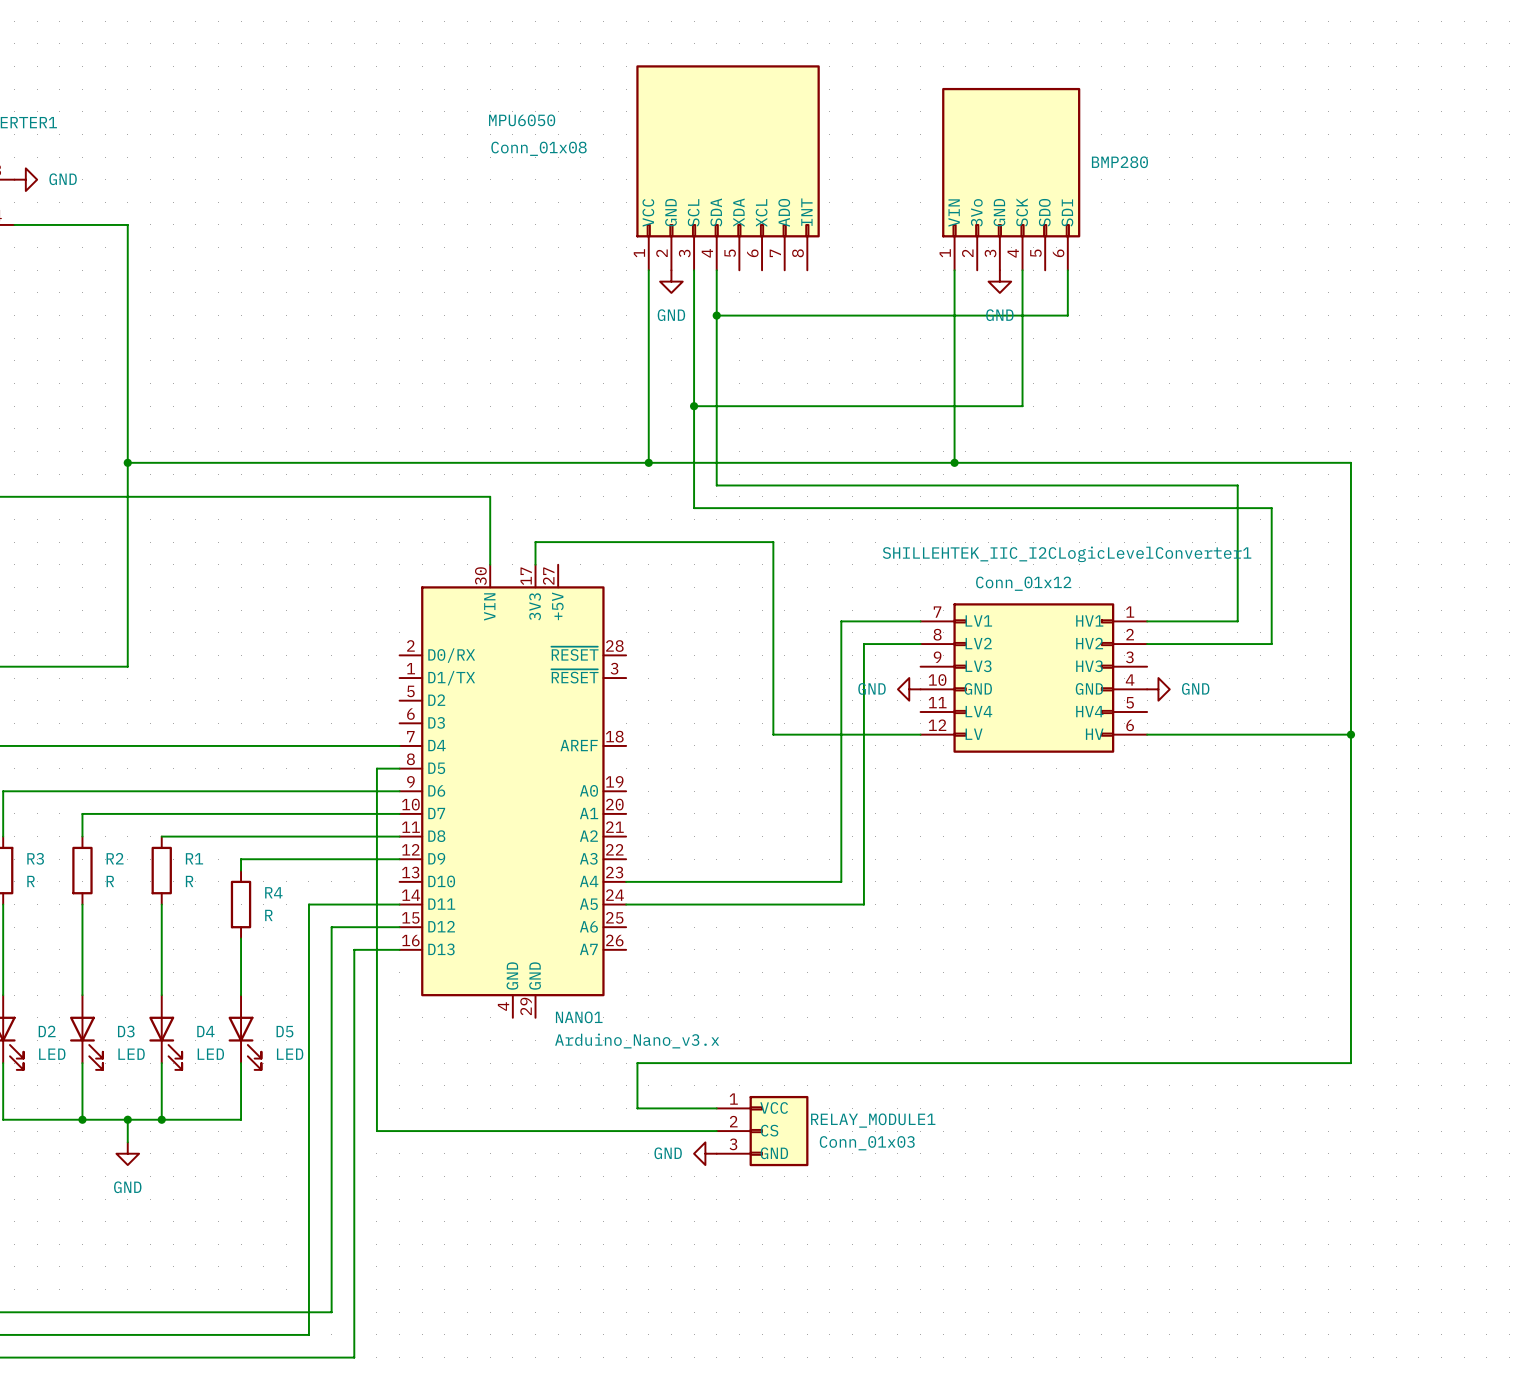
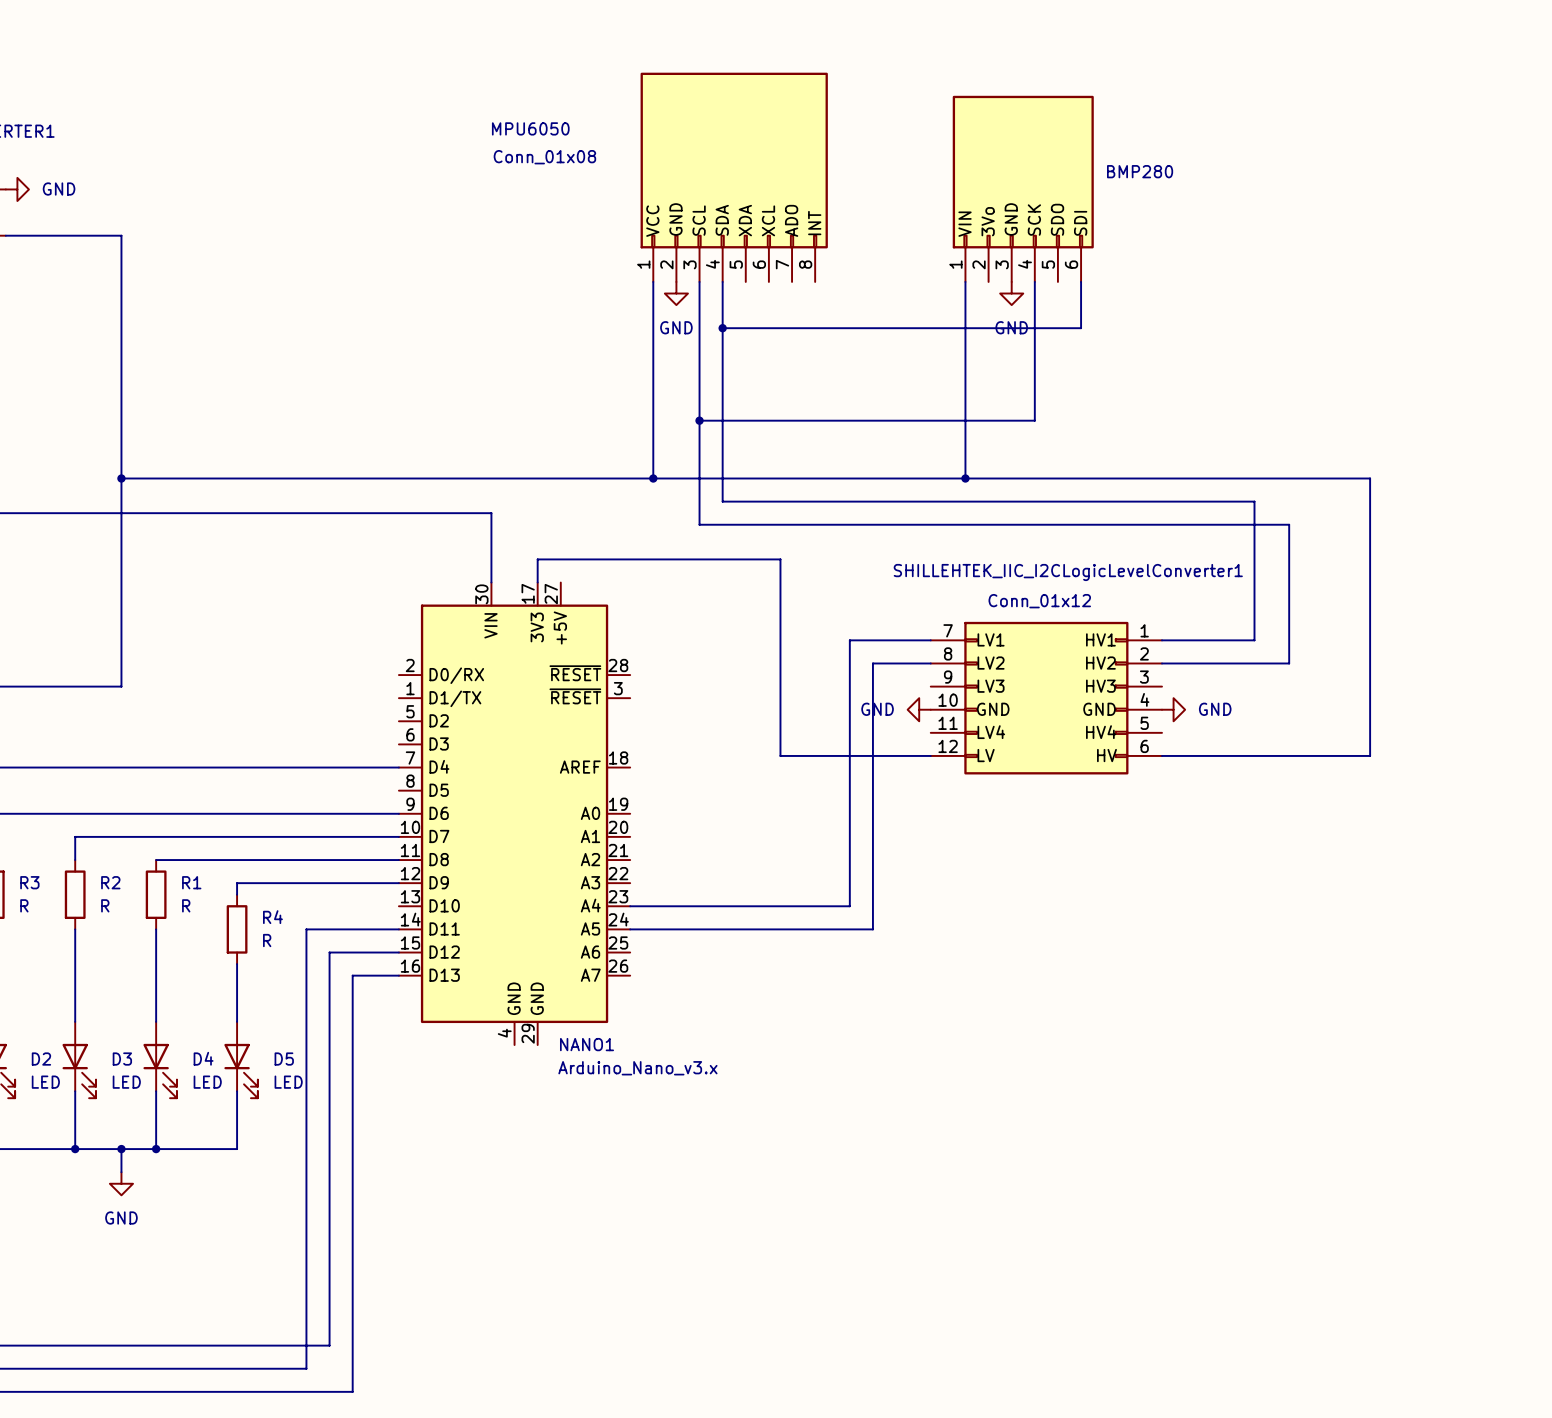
wire: (1350, 734) (1350, 1063) (637, 1063) (637, 1108) (716, 1108) -> none
junction: (1350, 734) -> none
wire: (399, 768) (376, 768) (376, 1131) (716, 1131) -> none
RELAY_MODULE1: Conn_01x03 (762, 1131) -> none
power symbol: GND (705, 1153) -> none

